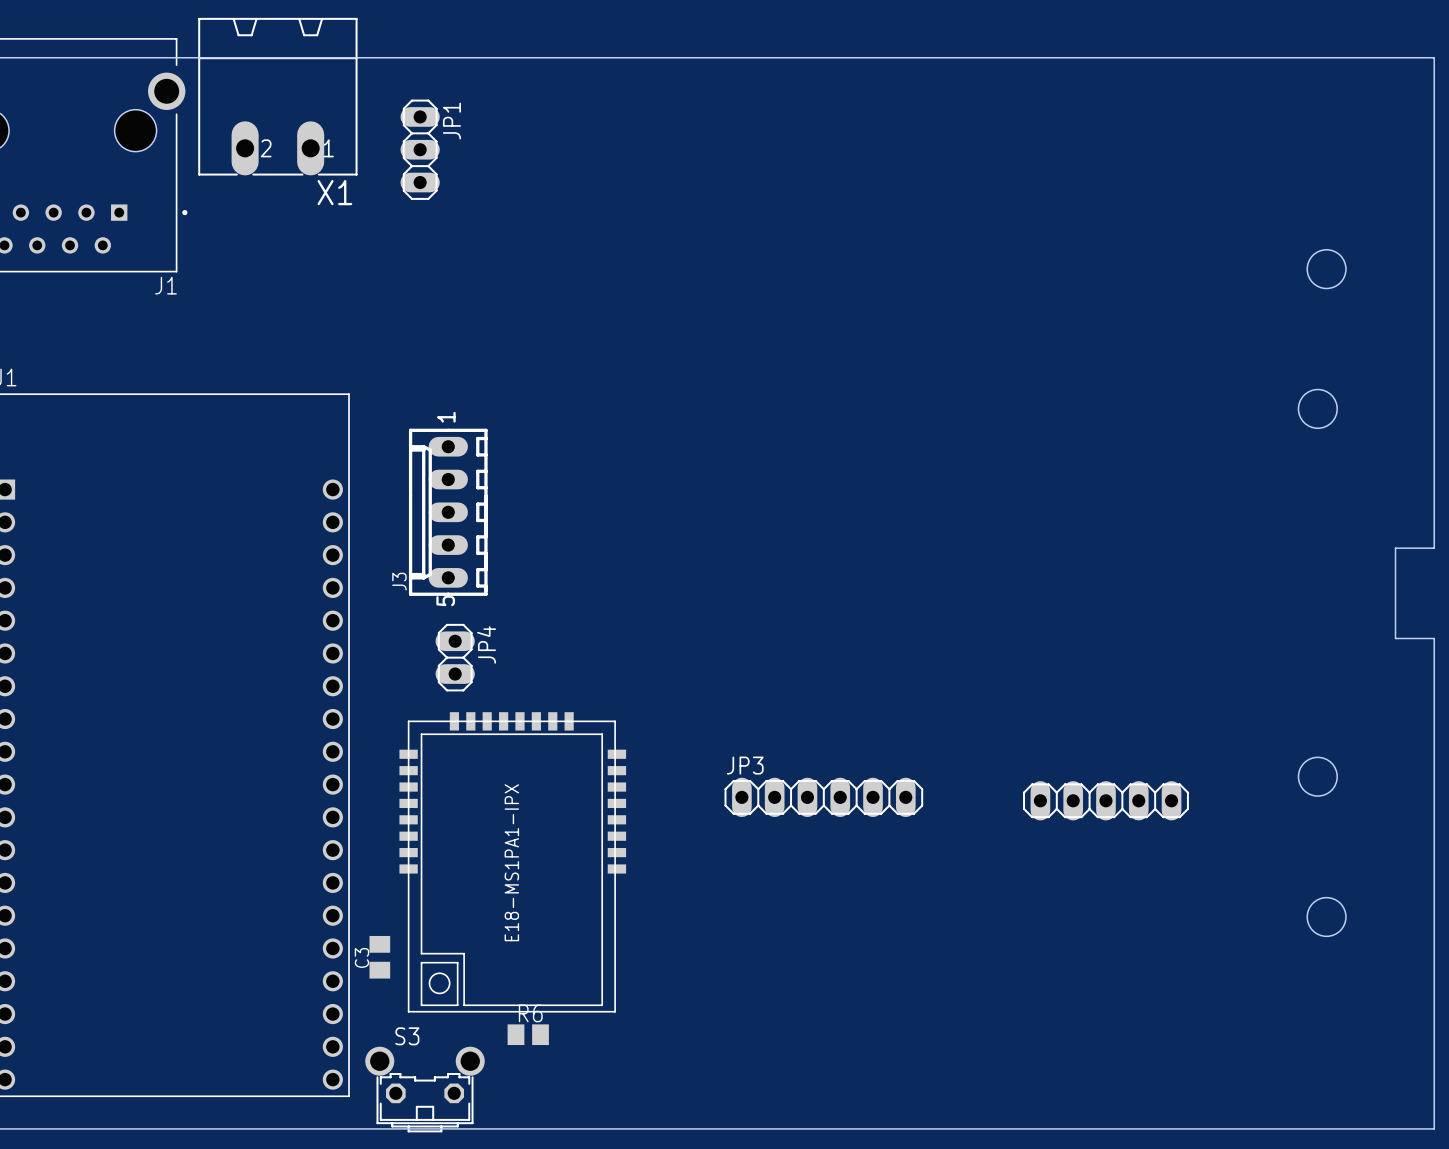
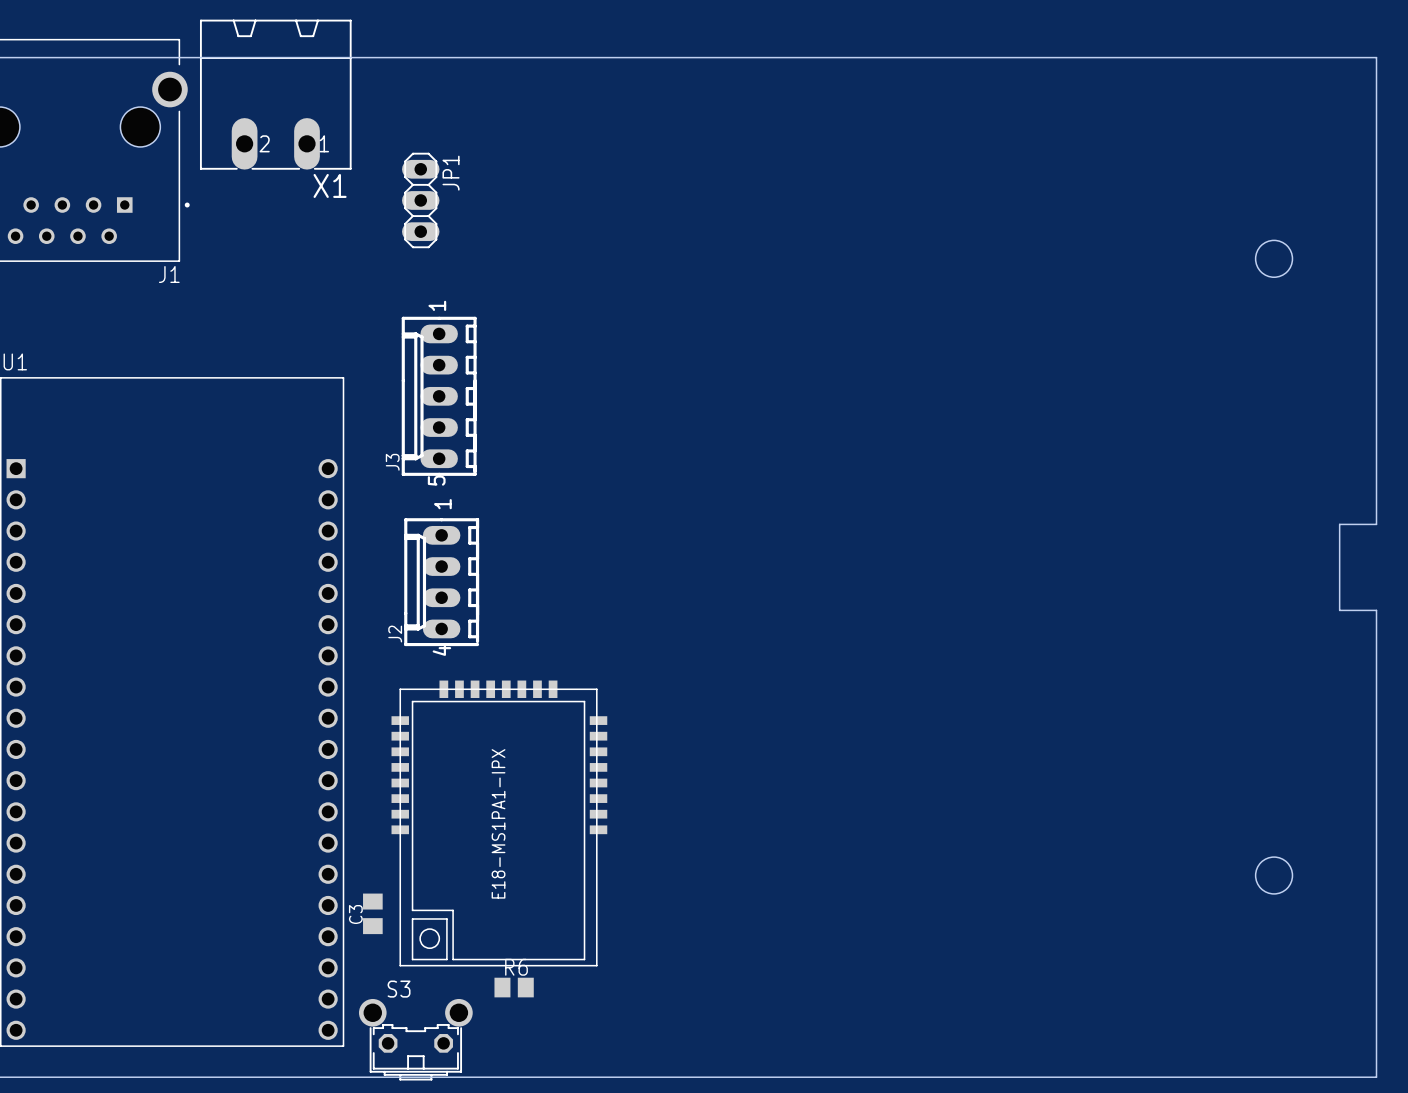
JP1 position: (420, 149) -> (420, 200)
round board edge: [1297, 389, 1338, 429] -> none
J3 position: (448, 512) -> (439, 396)
J2: none -> (441, 582)
JP4: (455, 657) -> none
round board edge: [1297, 756, 1338, 797] -> none
JP3: (823, 797) -> none
part: (1105, 800) -> none

